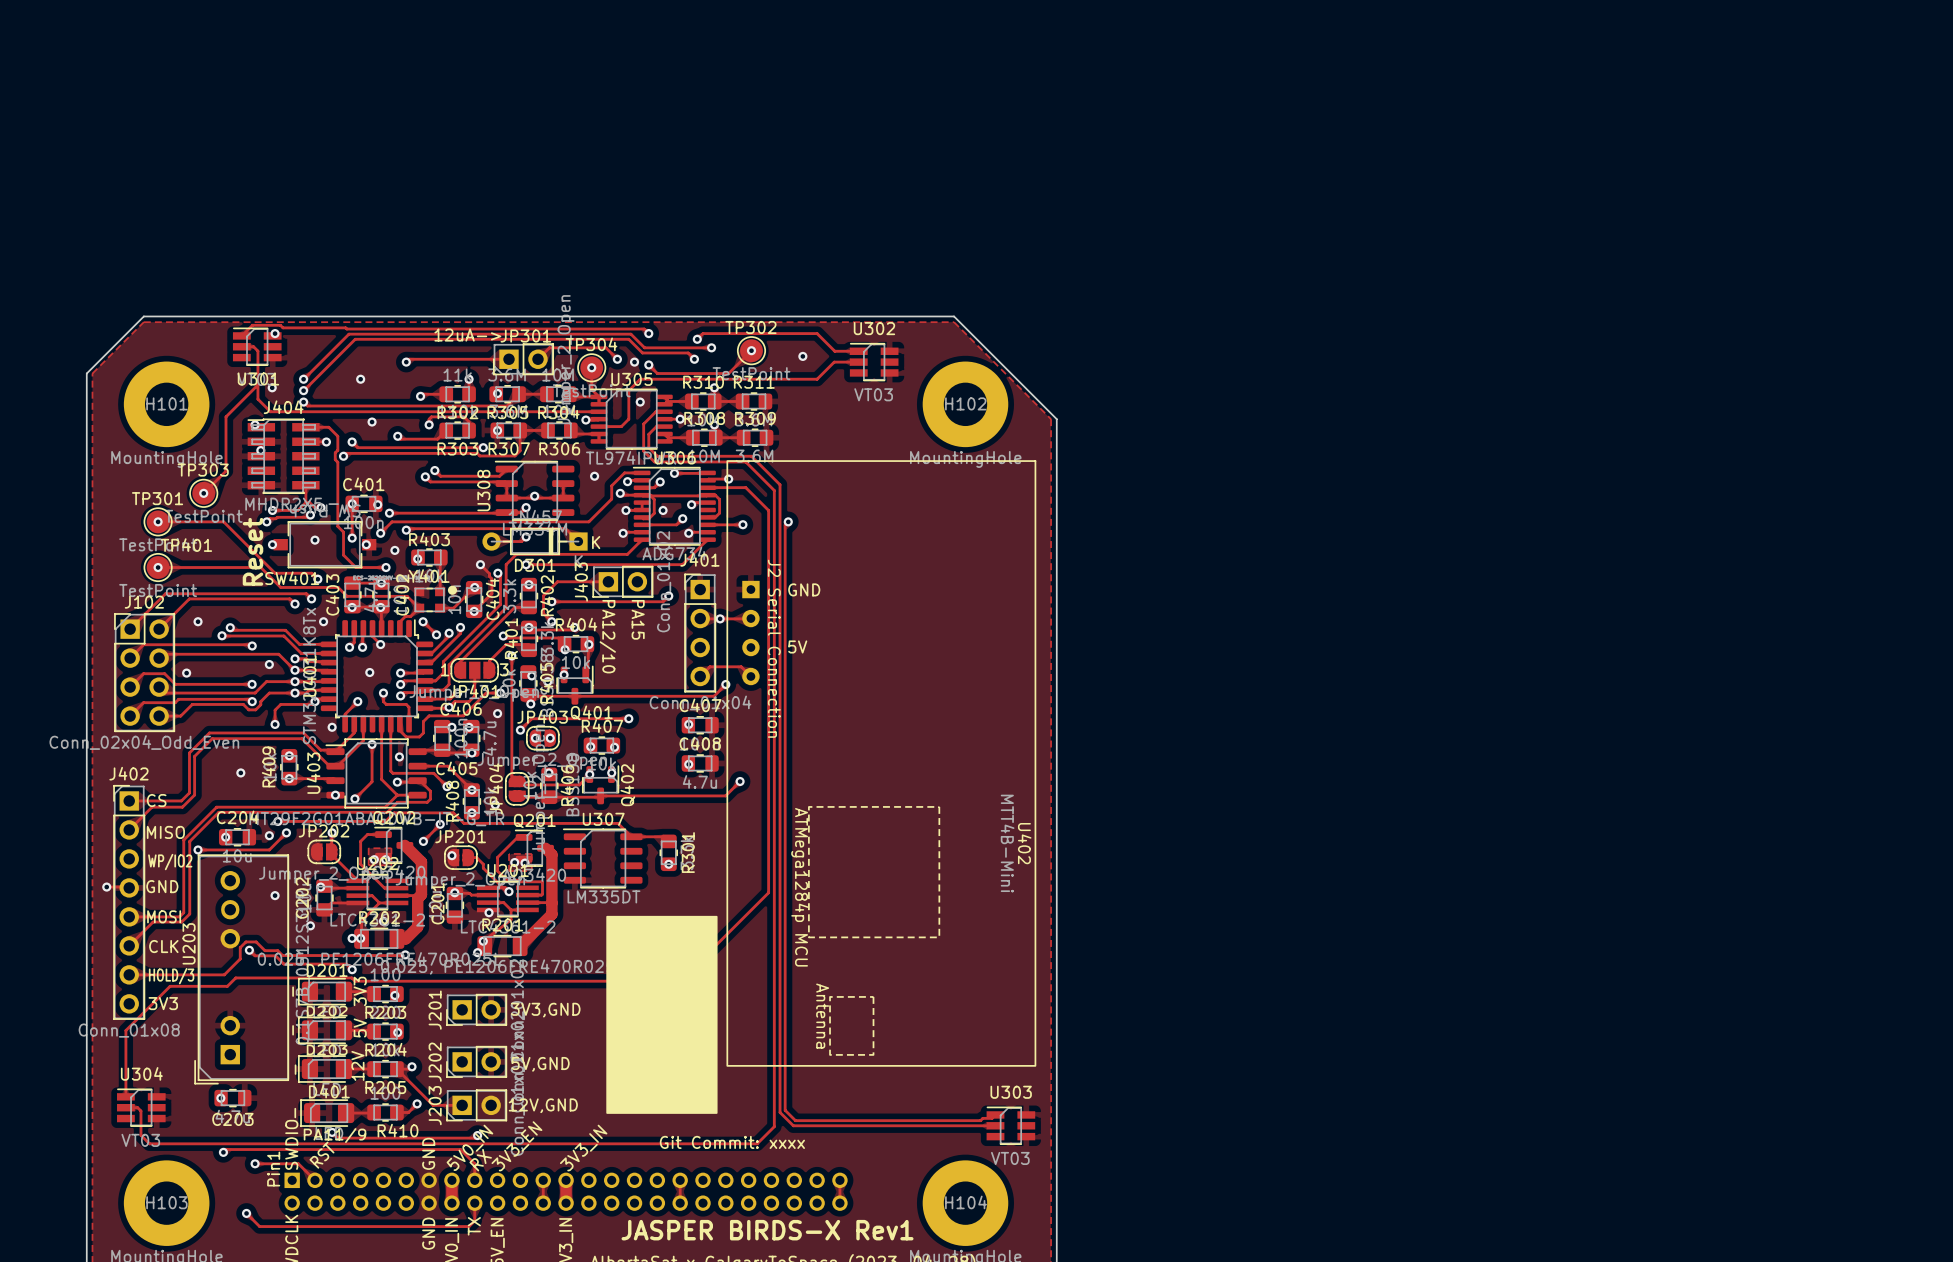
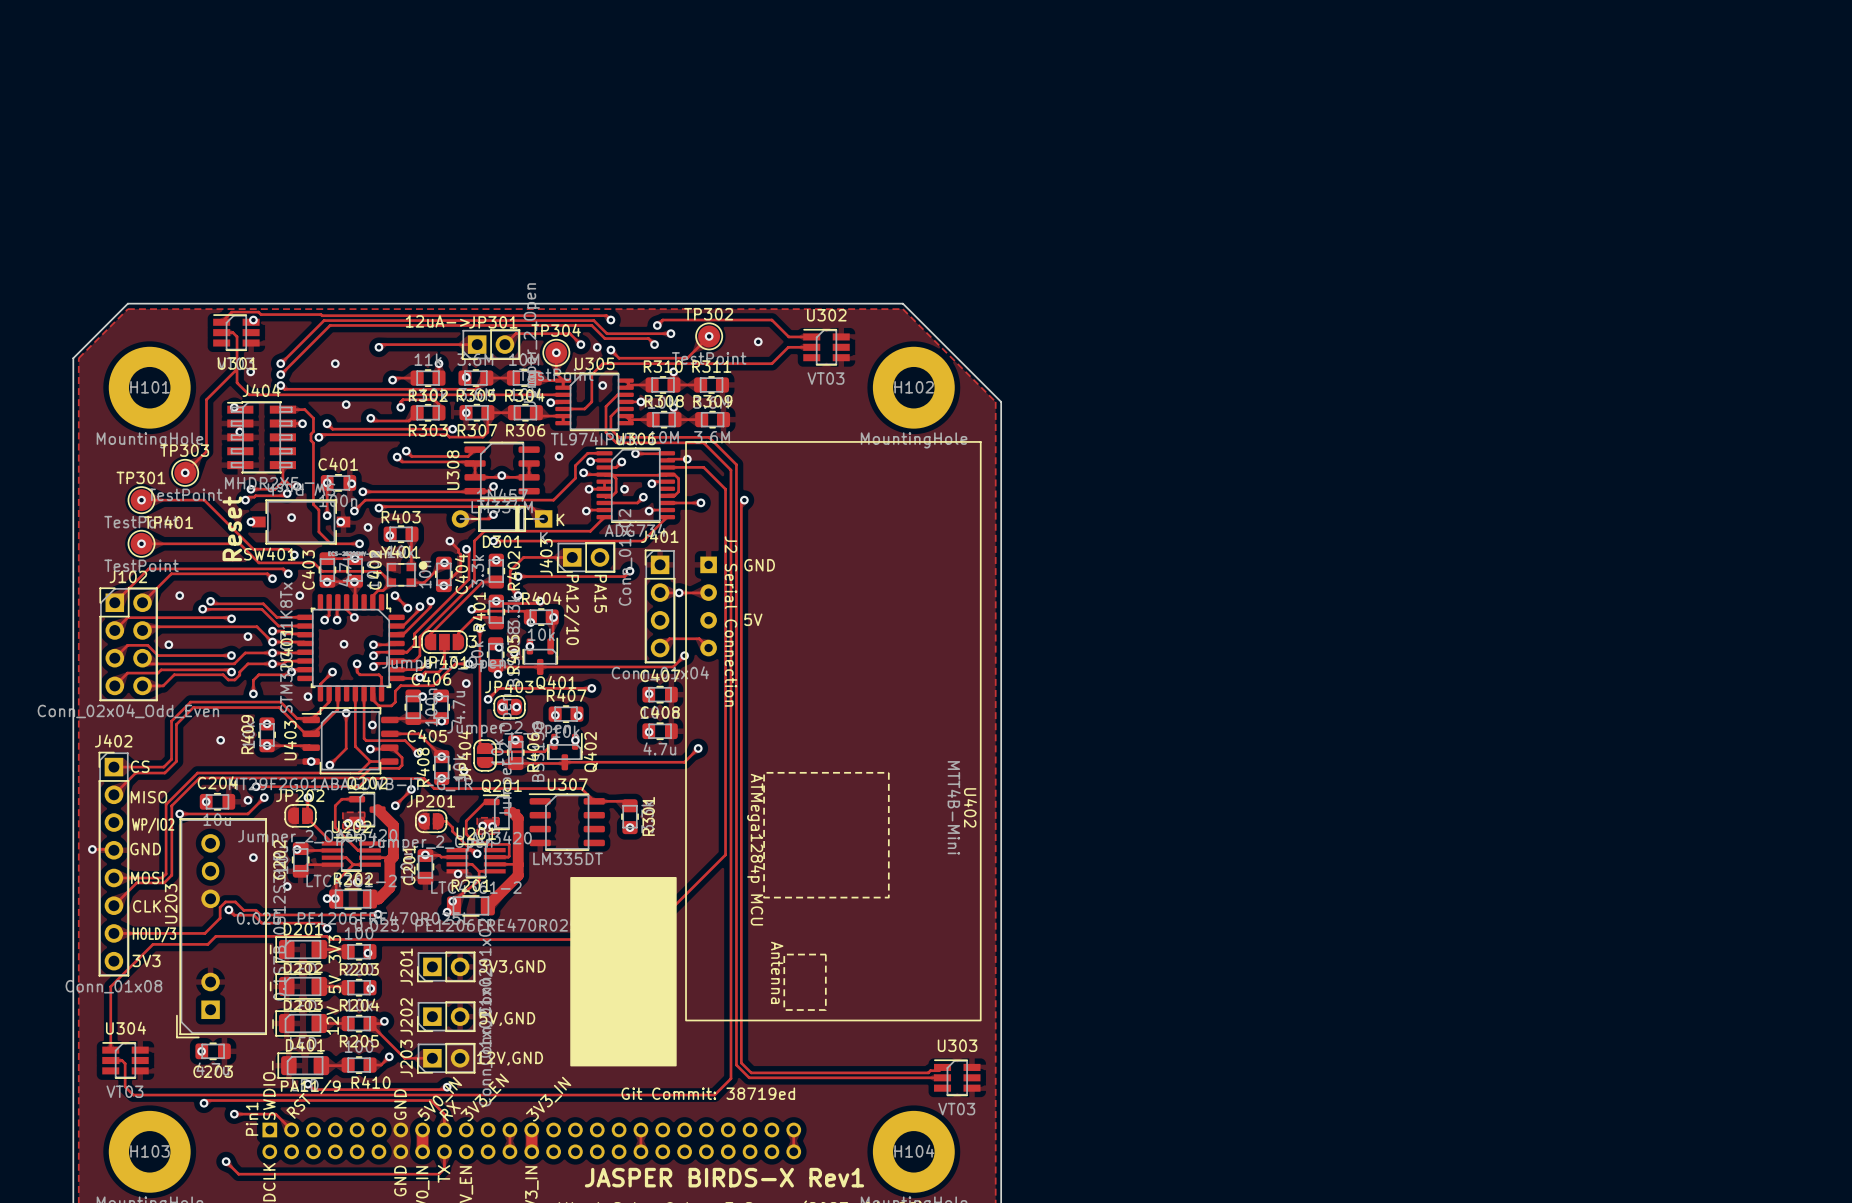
text: Git Commit: xxxx (732, 1142) -> Git Commit: 38719ed (708, 1093)

